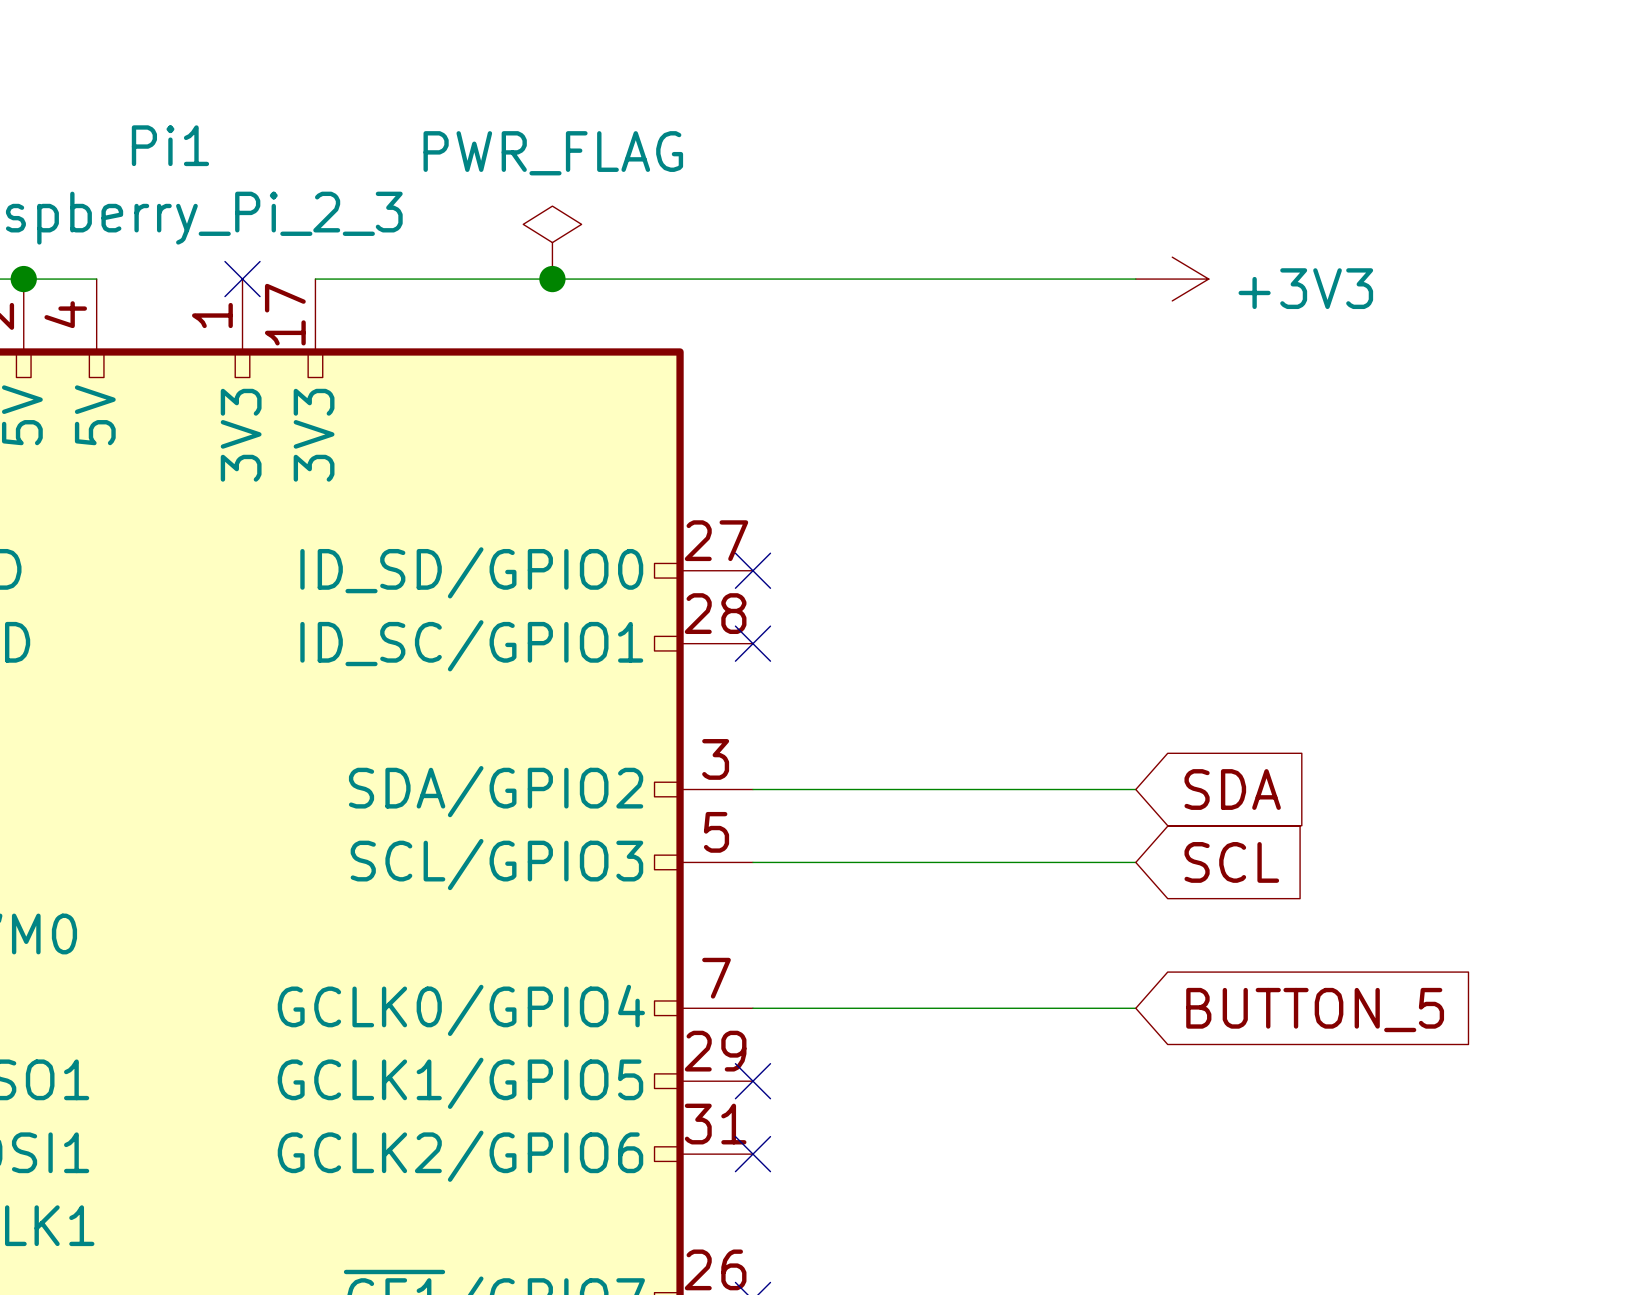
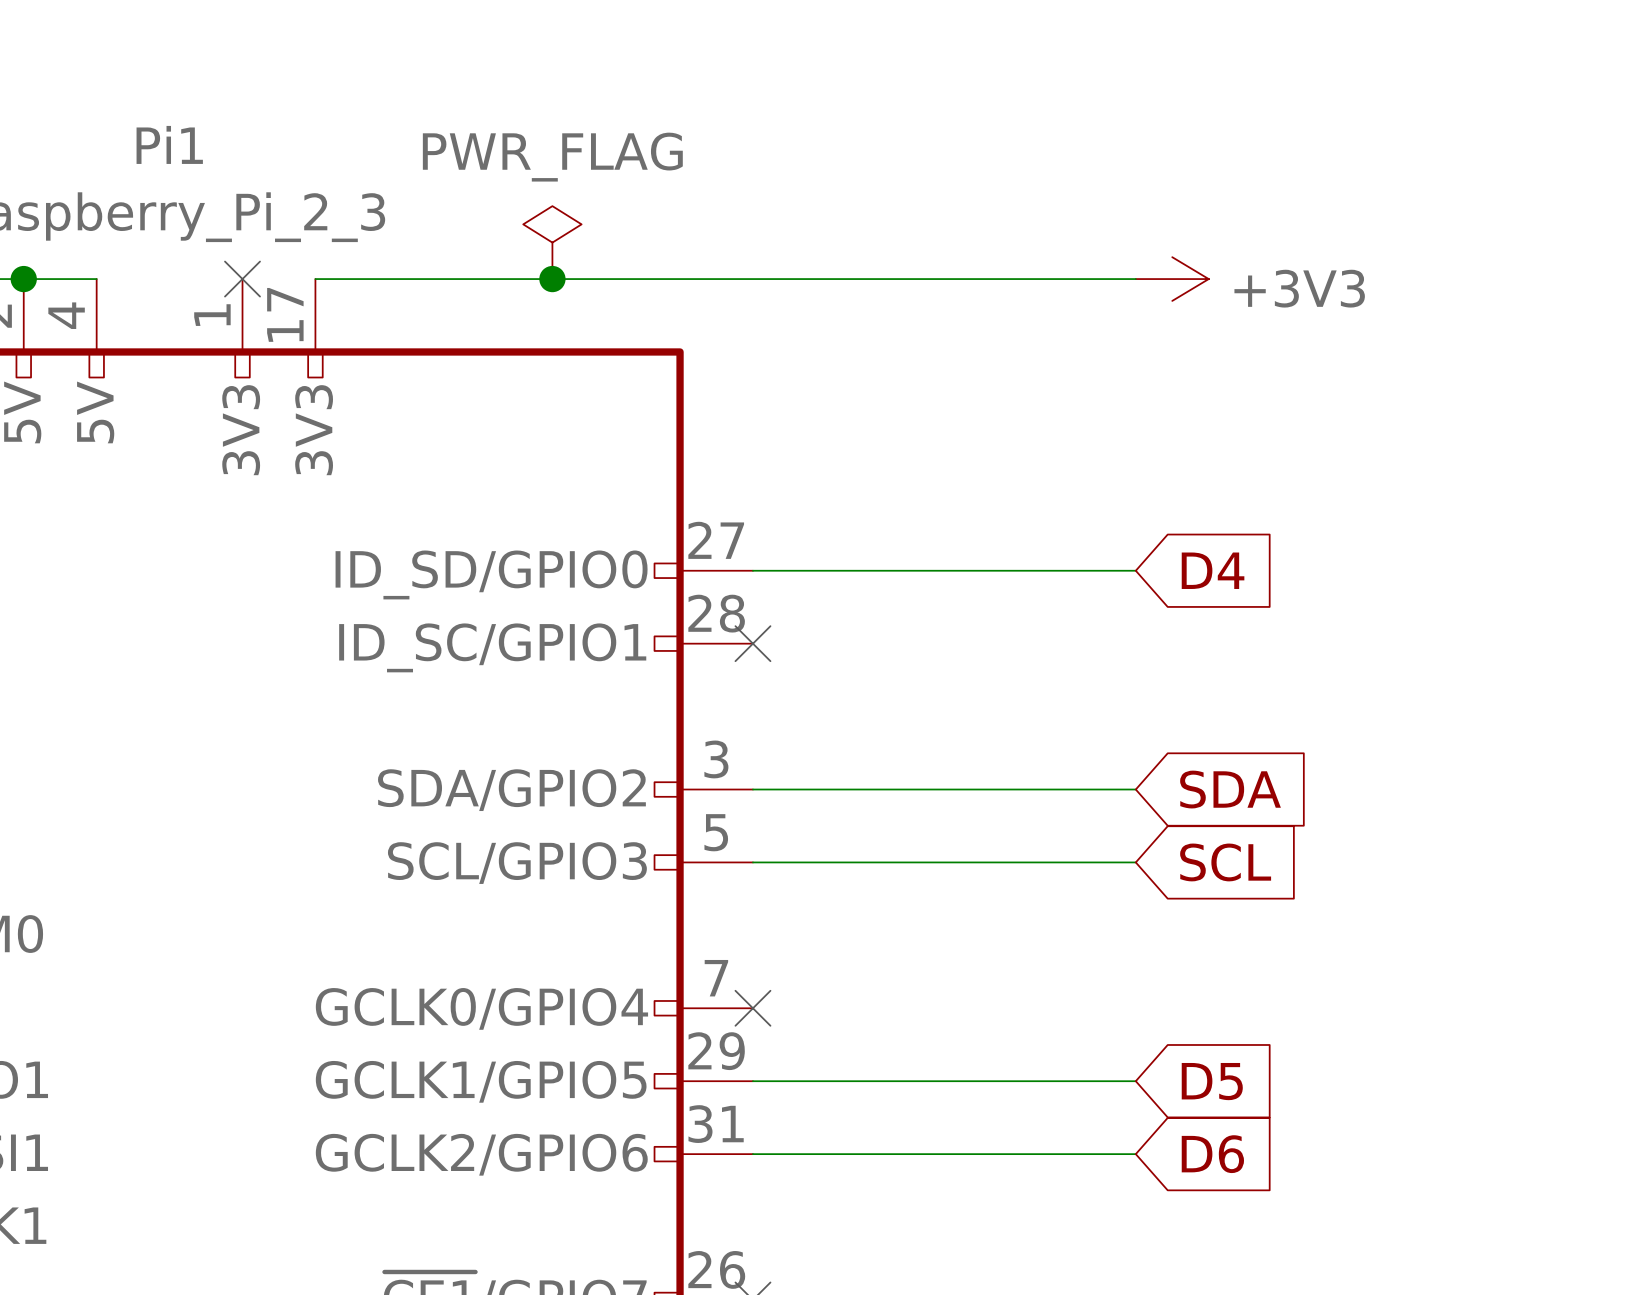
global label: none -> D4 (1213, 570)
wire: none -> (752, 570) (1135, 570)
no-connect mark: (752, 570) -> none
wire: (752, 1008) (1135, 1008) -> (752, 1081) (1135, 1081)
no-connect mark: none -> (752, 1008)
global label: BUTTON_5 (1315, 1010) -> none
no-connect mark: (752, 1081) -> none
global label: none -> D5 (1212, 1081)
wire: none -> (752, 1154) (1135, 1154)
no-connect mark: (752, 1154) -> none
global label: none -> D6 (1212, 1154)

